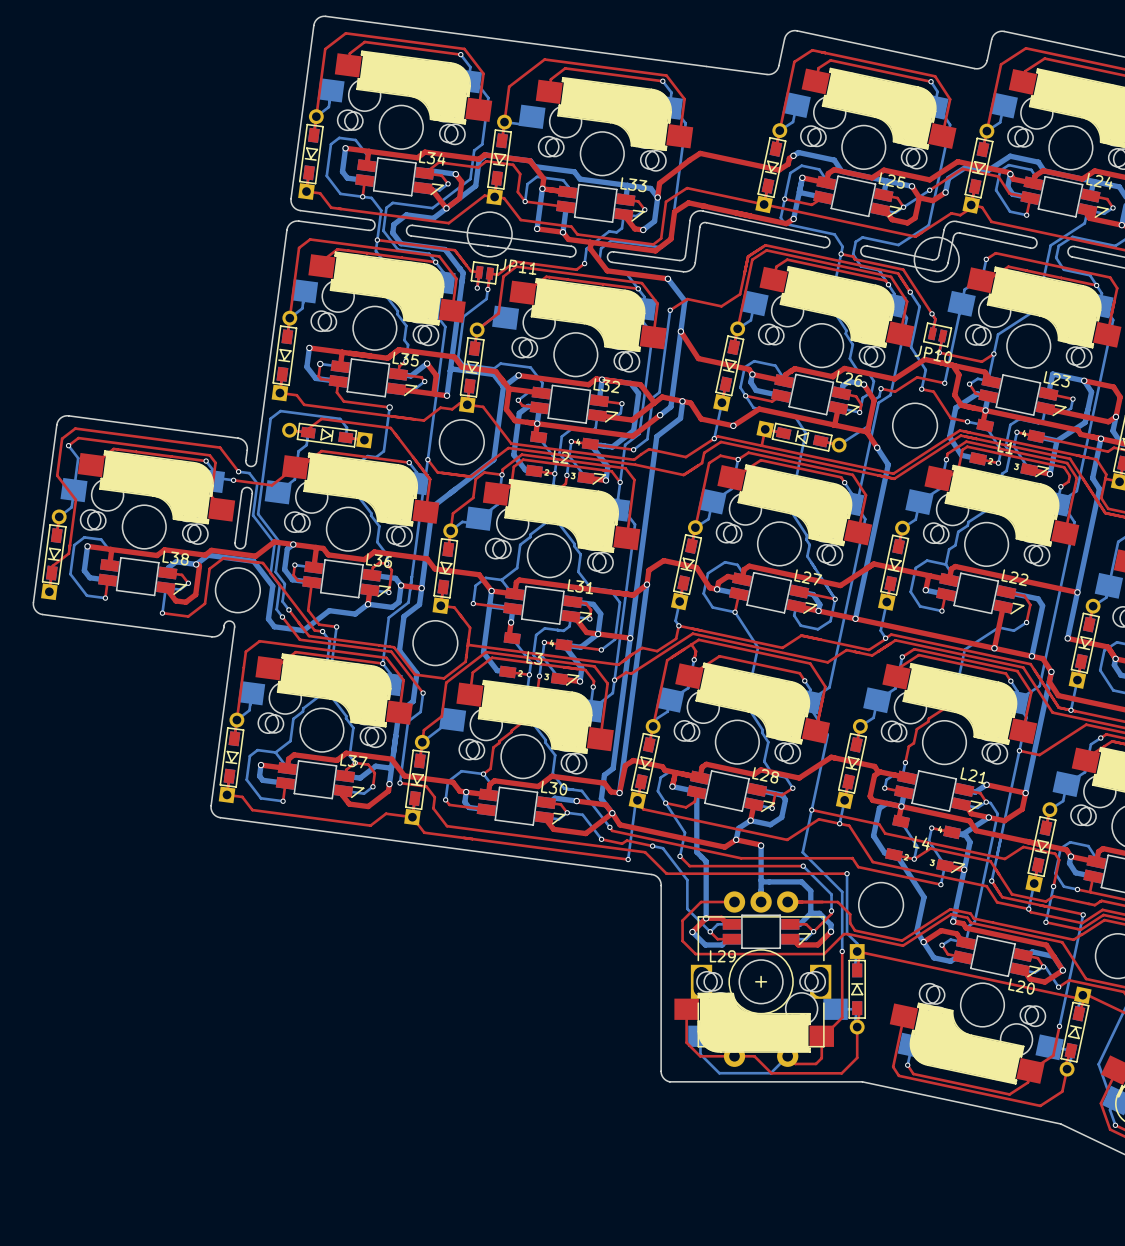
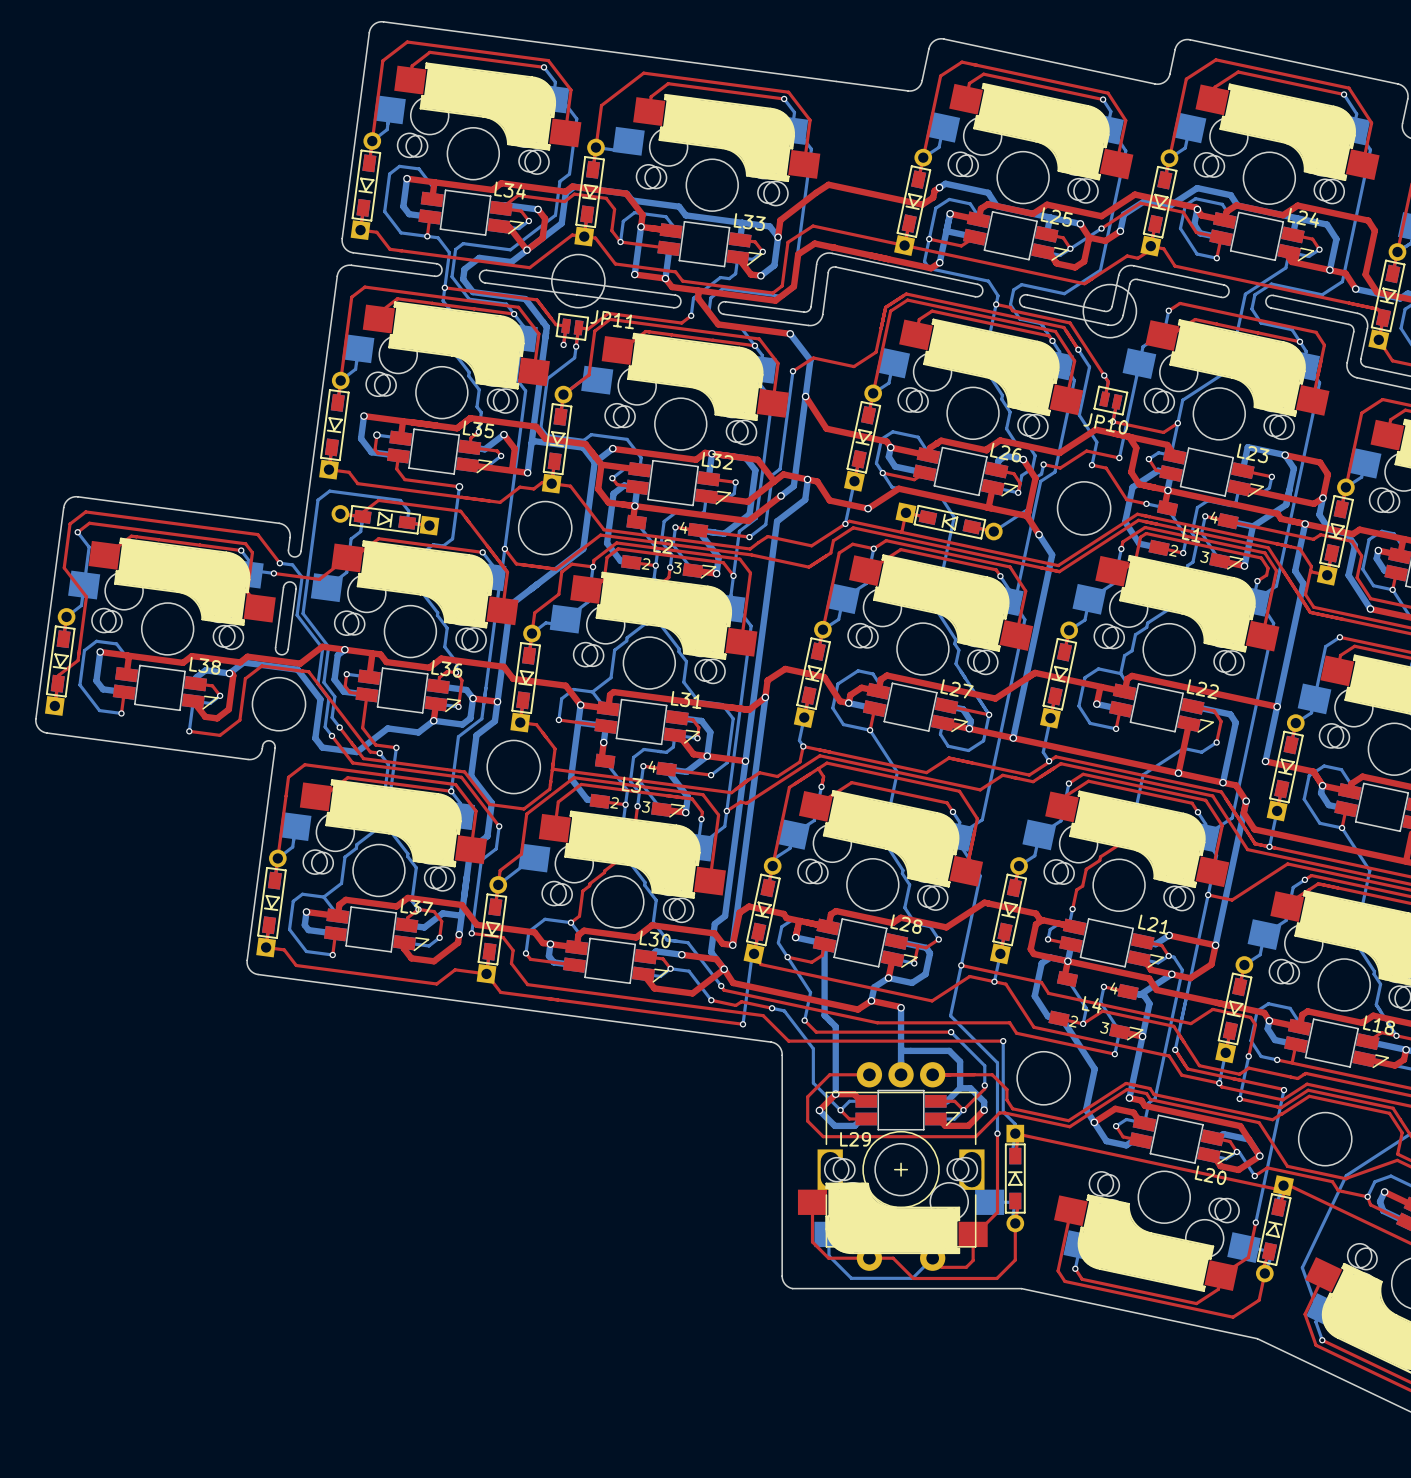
L1 footprint: [969, 418, 1050, 478] -> [1148, 500, 1244, 570]
L2 footprint: [525, 430, 606, 485] -> [621, 514, 717, 579]
L3 footprint: [499, 631, 580, 686] -> [589, 753, 685, 818]
L4 footprint: [885, 814, 965, 874] -> [1048, 970, 1144, 1041]

